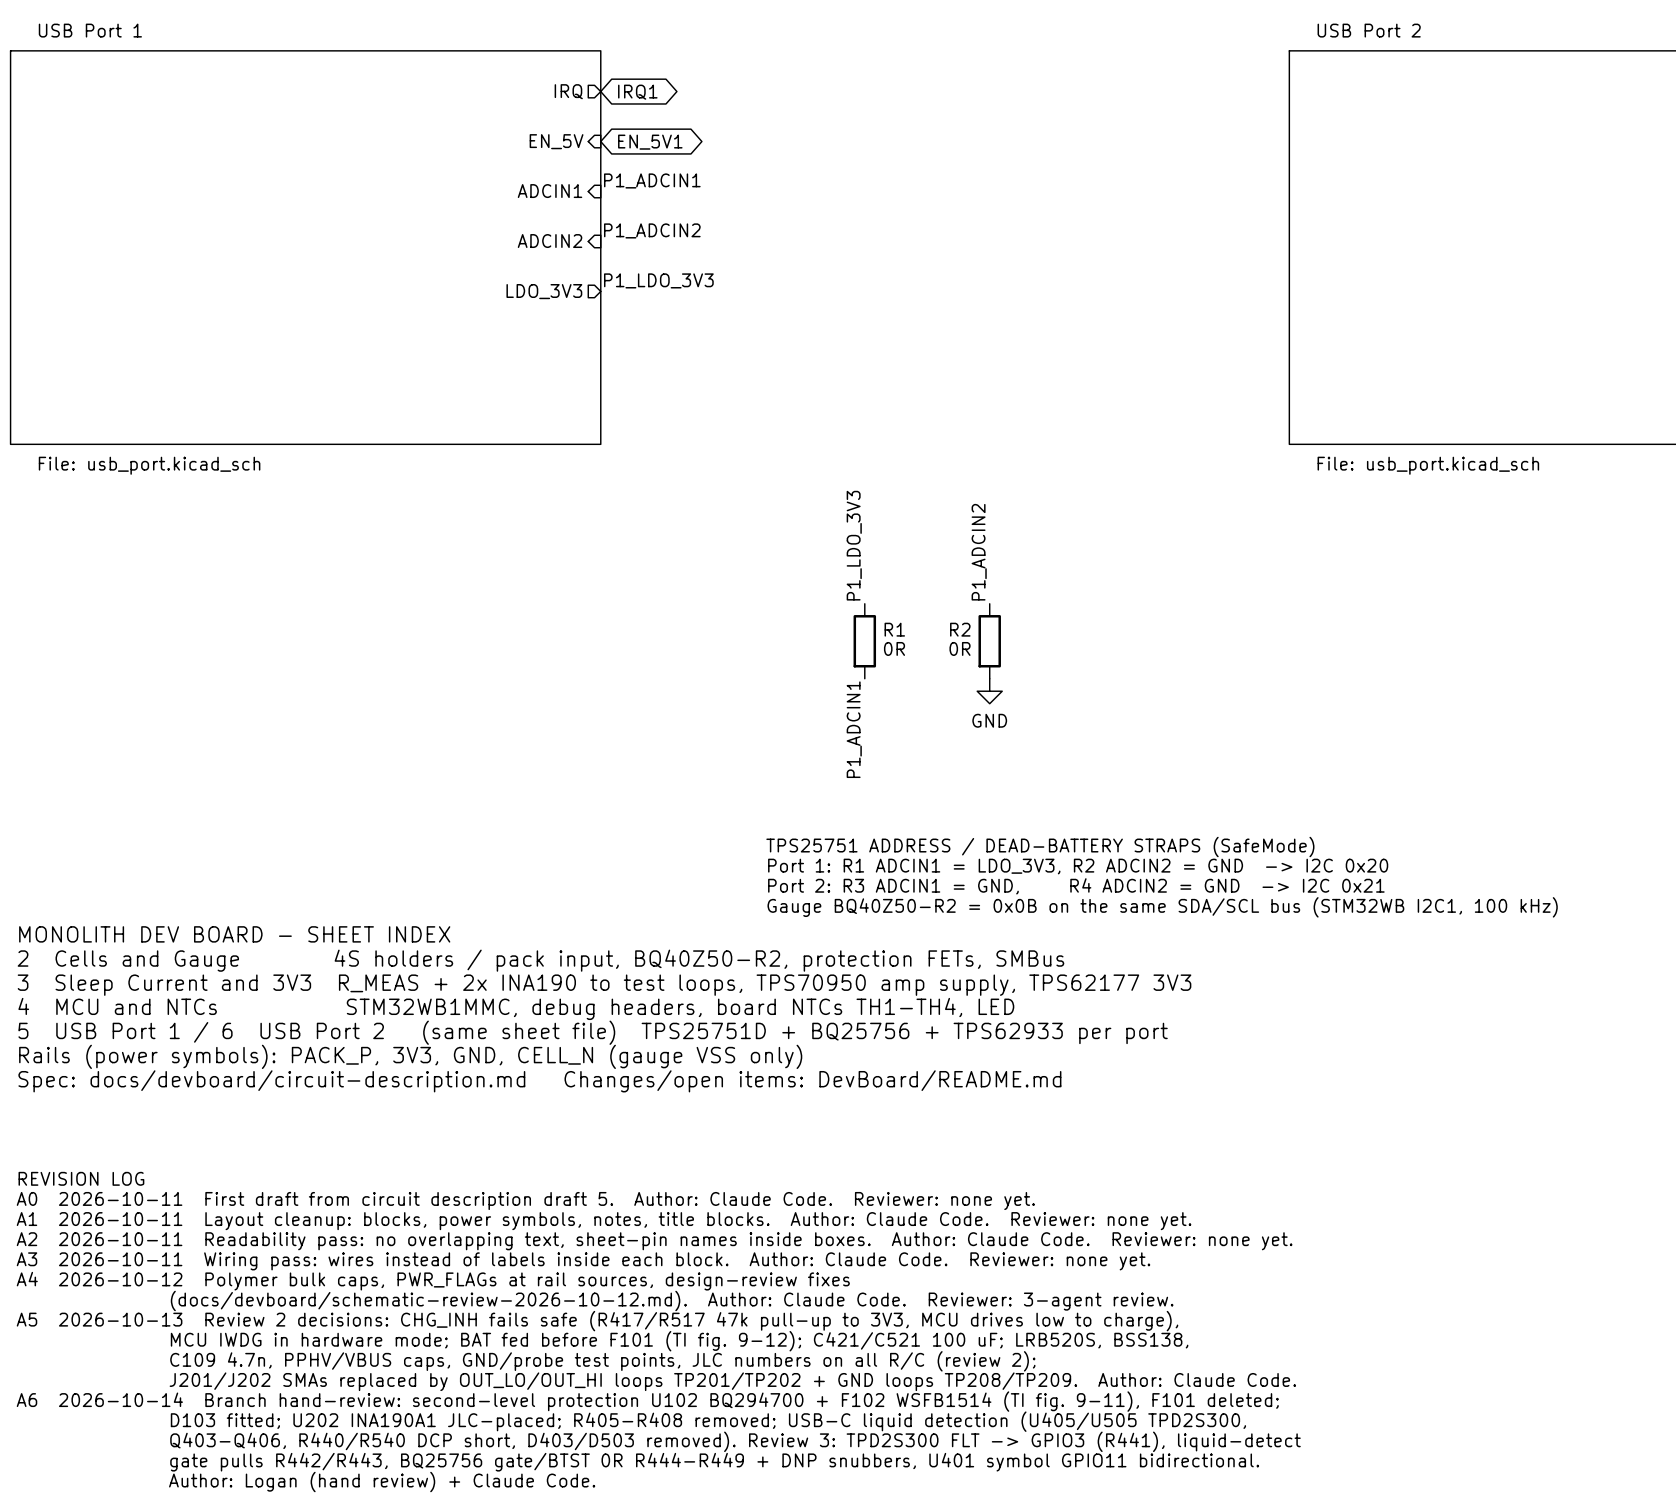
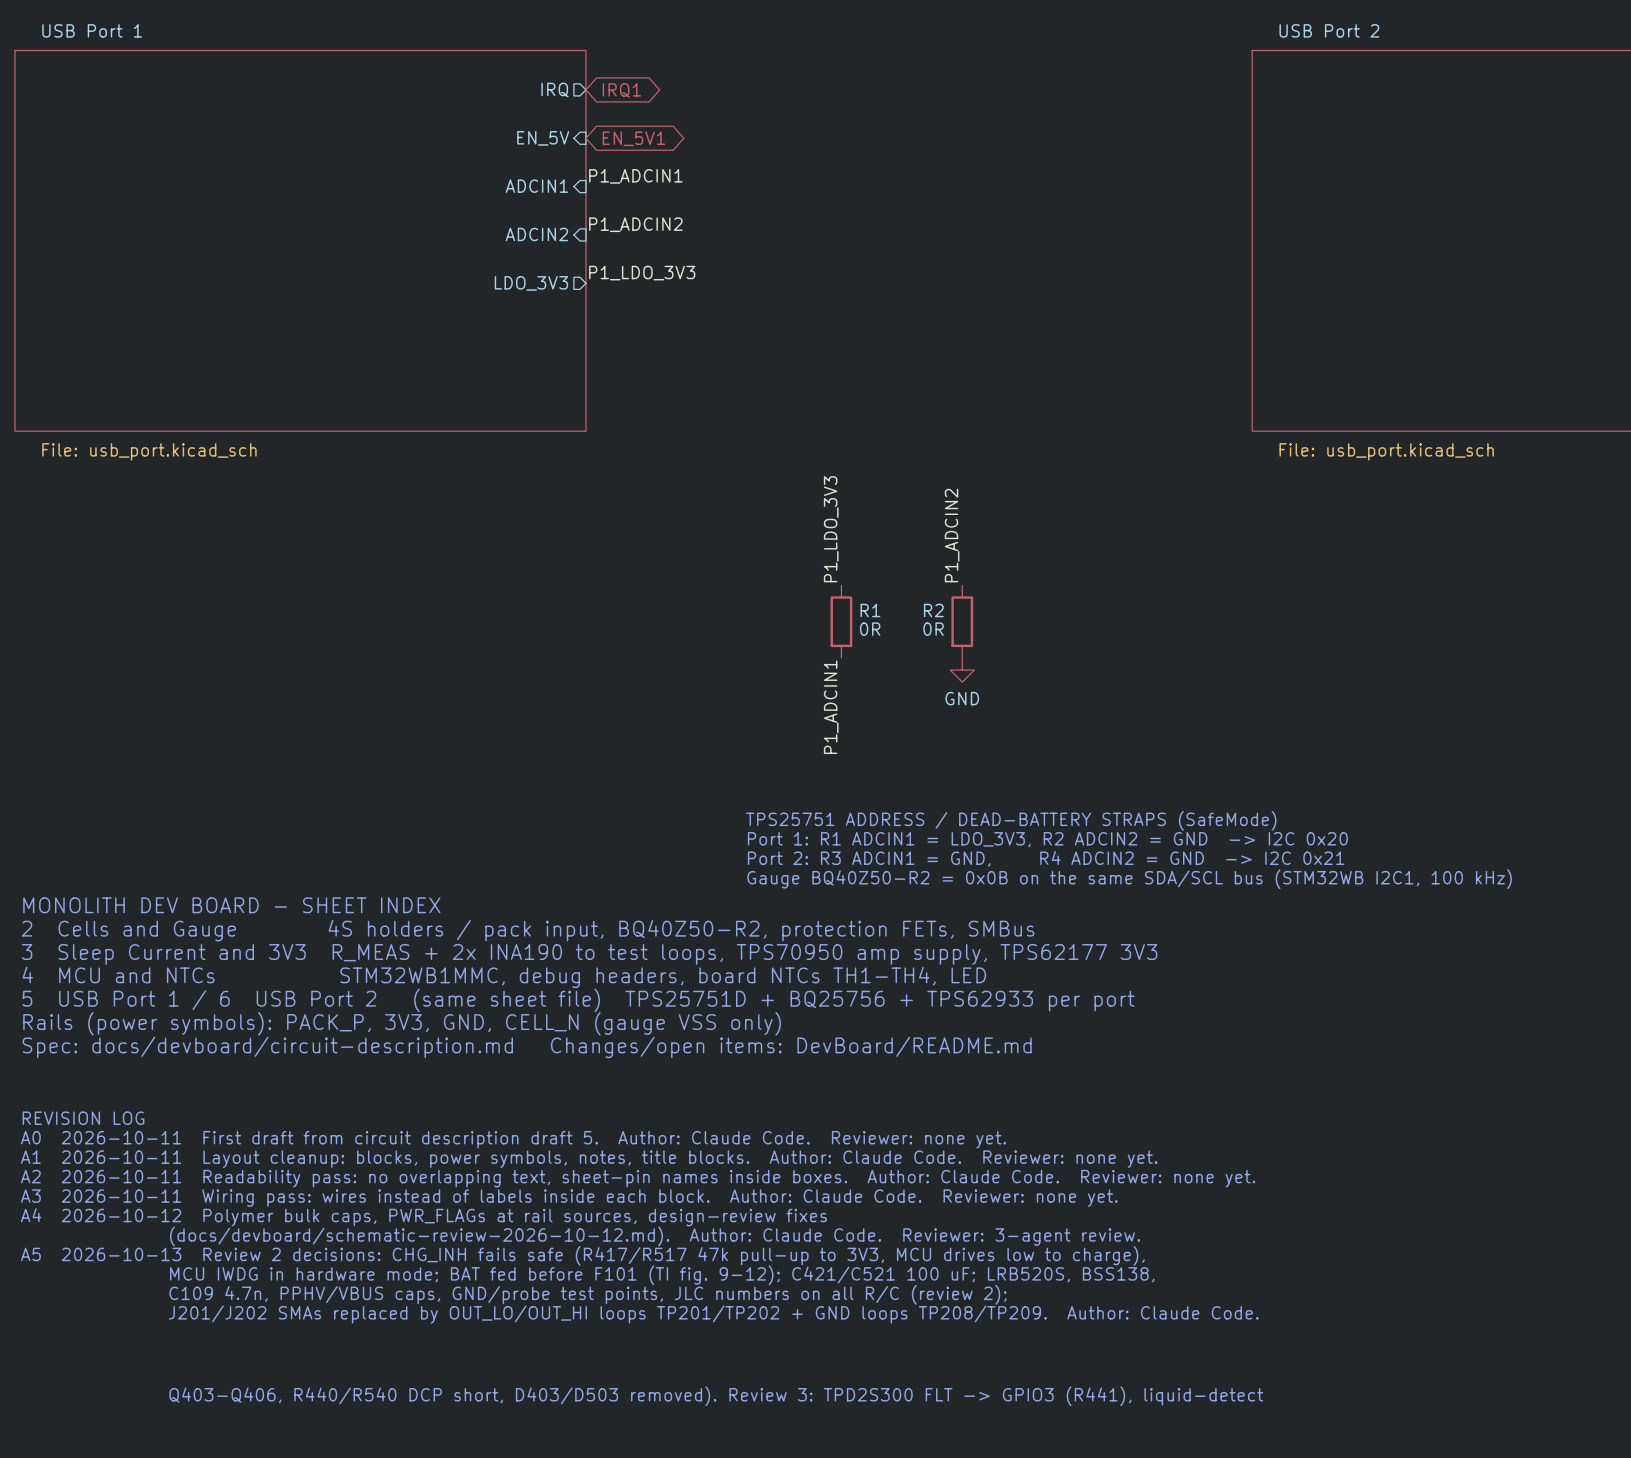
text position: REVISION LOG (81, 1178) -> REVISION LOG (83, 1118)
text position: A0 2026-10-11 First draft from circuit description draft 5. Author: Claude Code. Reviewer: none yet. (525, 1201) -> A0 2026-10-11 First draft from circuit description draft 5. Author: Claude Code. Reviewer: none yet. (513, 1139)
text position: A1 2026-10-11 Layout cleanup: blocks, power symbols, notes, title blocks. Author: Claude Code. Reviewer: none yet. (604, 1221) -> A1 2026-10-11 Layout cleanup: blocks, power symbols, notes, title blocks. Author: Claude Code. Reviewer: none yet. (589, 1159)
text position: A2 2026-10-11 Readability pass: no overlapping text, sheet-pin names inside boxes. Author: Claude Code. Reviewer: none yet. (654, 1241) -> A2 2026-10-11 Readability pass: no overlapping text, sheet-pin names inside boxes. Author: Claude Code. Reviewer: none yet. (638, 1178)
text position: A3 2026-10-11 Wiring pass: wires instead of labels inside each block. Author: Claude Code. Reviewer: none yet. (583, 1261) -> A3 2026-10-11 Wiring pass: wires instead of labels inside each block. Author: Claude Code. Reviewer: none yet. (569, 1198)
text position: A4 2026-10-12 Polymer bulk caps, PWR_FLAGs at rail sources, design-review fixes (433, 1281) -> A4 2026-10-12 Polymer bulk caps, PWR_FLAGs at rail sources, design-review fixes (423, 1217)
text position: (docs/devboard/schematic-review-2026-10-12.md). Author: Claude Code. Reviewer: 3-agent review. (672, 1300) -> (docs/devboard/schematic-review-2026-10-12.md). Author: Claude Code. Reviewer: 3-agent review. (655, 1236)
text position: A5 2026-10-13 Review 2 decisions: CHG_INH fails safe (R417/R517 47k pull-up to 3V3, MCU drives low to charge), (597, 1321) -> A5 2026-10-13 Review 2 decisions: CHG_INH fails safe (R417/R517 47k pull-up to 3V3, MCU drives low to charge), (582, 1255)
text position: MCU IWDG in hardware mode; BAT fed before F101 (TI fig. 9-12); C421/C521 100 uF; LRB520S, BSS138, (679, 1341) -> MCU IWDG in hardware mode; BAT fed before F101 (TI fig. 9-12); C421/C521 100 uF; LRB520S, BSS138, (662, 1275)
text position: C109 4.7n, PPHV/VBUS caps, GND/probe test points, JLC numbers on all R/C (review 2); (602, 1361) -> C109 4.7n, PPHV/VBUS caps, GND/probe test points, JLC numbers on all R/C (review 2); (587, 1294)
text position: J201/J202 SMAs replaced by OUT_LO/OUT_HI loops TP201/TP202 + GND loops TP208/TP209. Author: Claude Code. (732, 1381) -> J201/J202 SMAs replaced by OUT_LO/OUT_HI loops TP201/TP202 + GND loops TP208/TP209. Author: Claude Code. (713, 1314)
text: A6 2026-10-14 Branch hand-review: second-level protection U102 BQ294700 + F102 WSFB1514 (TI fig. 9-11), F101 deleted; (647, 1401) -> none
text: D103 fitted; U202 INA190A1 JLC-placed; R405-R408 removed; USB-C liquid detection (U405/U505 TPD2S300, (708, 1421) -> none
text: gate pulls R442/R443, BQ25756 gate/BTST 0R R444-R449 + DNP snubbers, U401 symbol GPIO11 bidirectional. (714, 1462) -> none
text: Author: Logan (hand review) + Claude Code. (382, 1482) -> none

